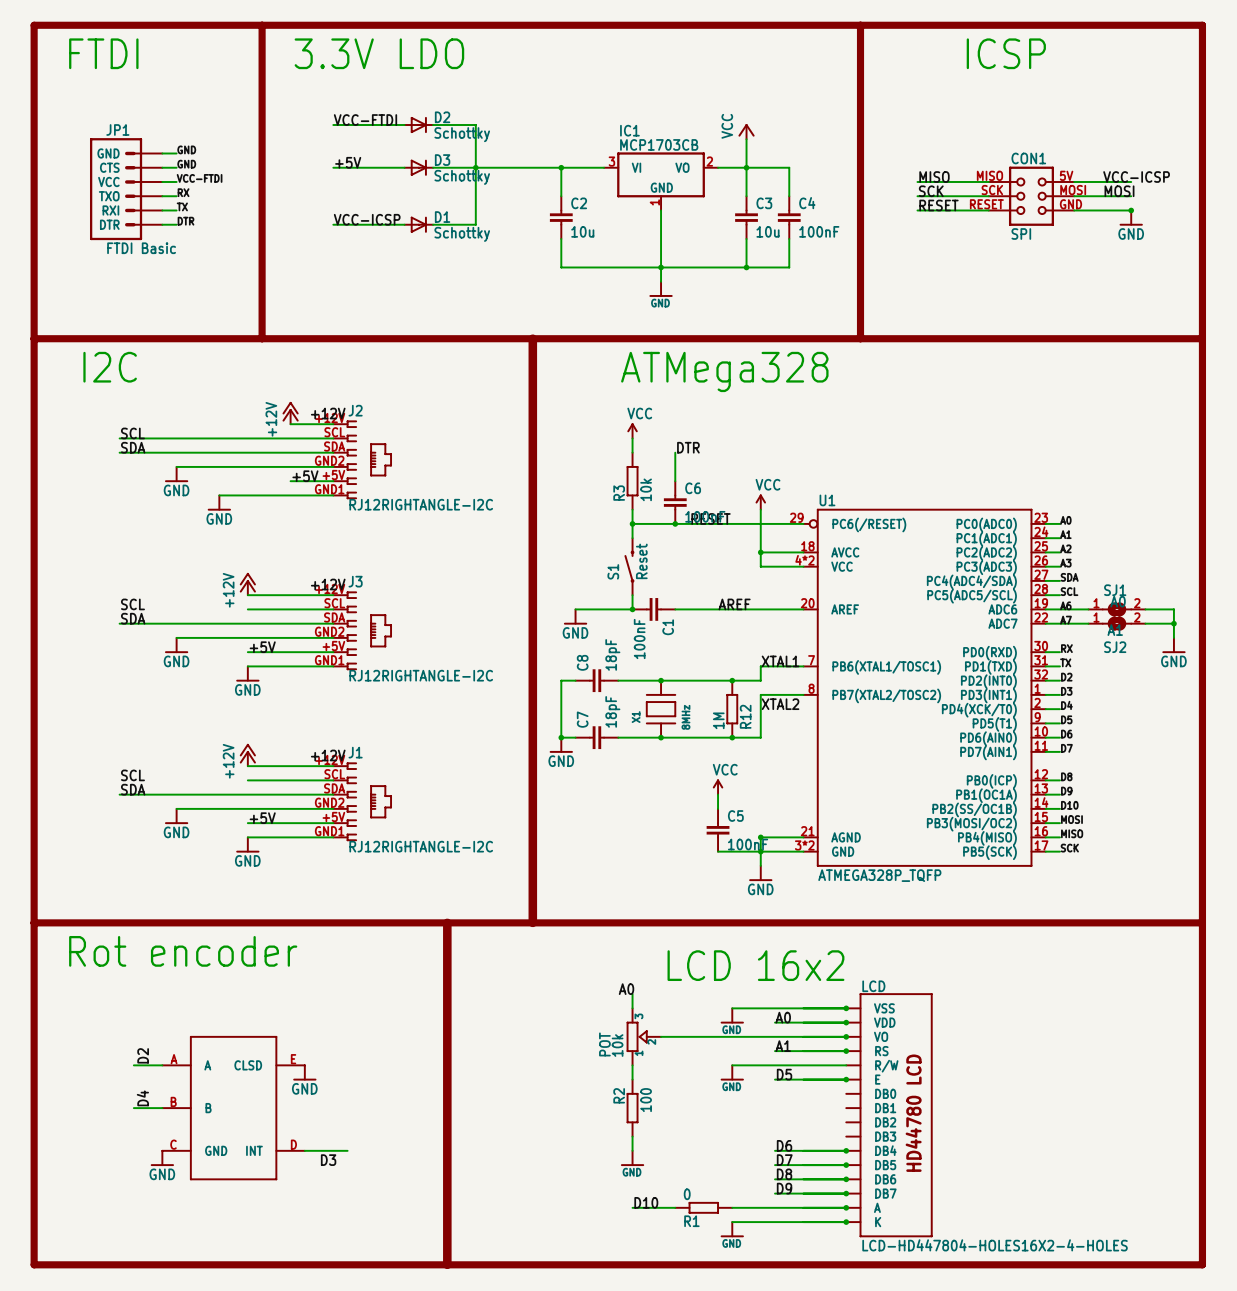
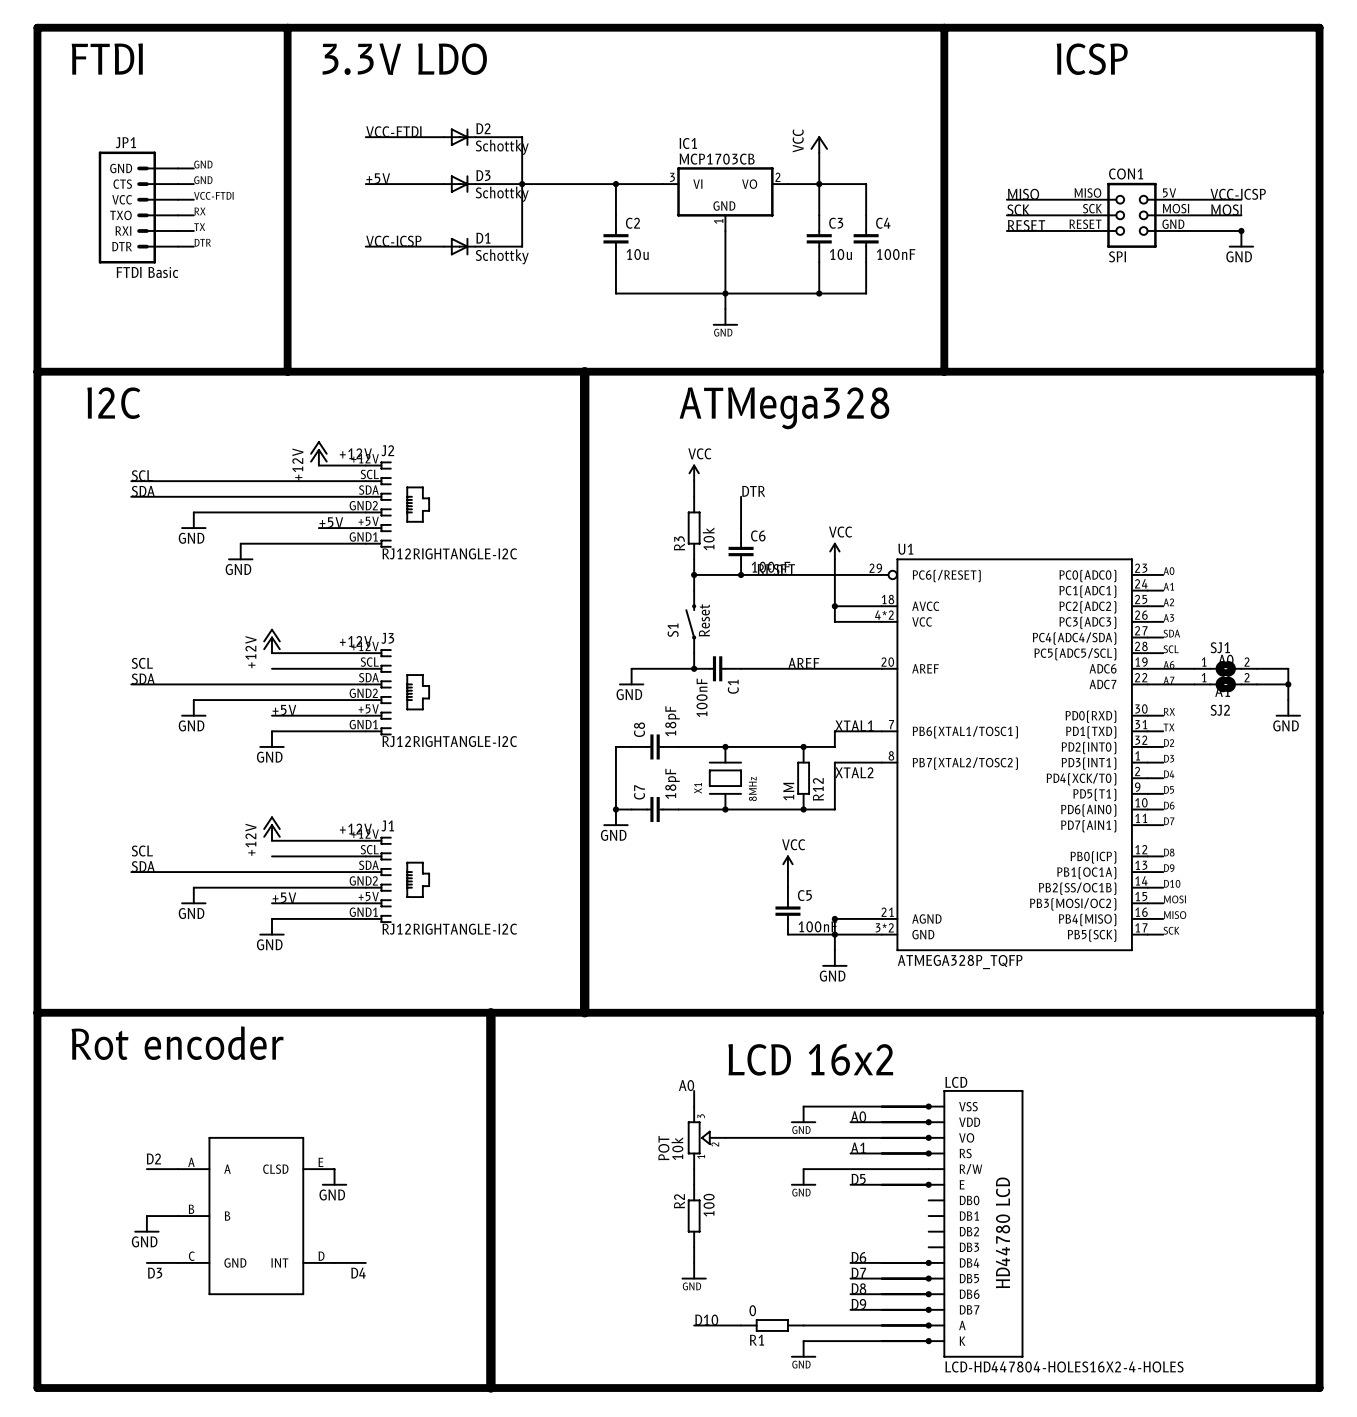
label rotation: 0° (143, 1055) -> 90° clockwise (153, 1158)
label: D4 (142, 1098) -> none
wire: none -> (146, 1262) (178, 1262)
wire: (333, 1150) (347, 1150) -> none
power symbol position: GND (162, 1158) -> GND (146, 1224)
label: none -> D3 (155, 1273)
label: D3 (328, 1160) -> D4 (358, 1273)

